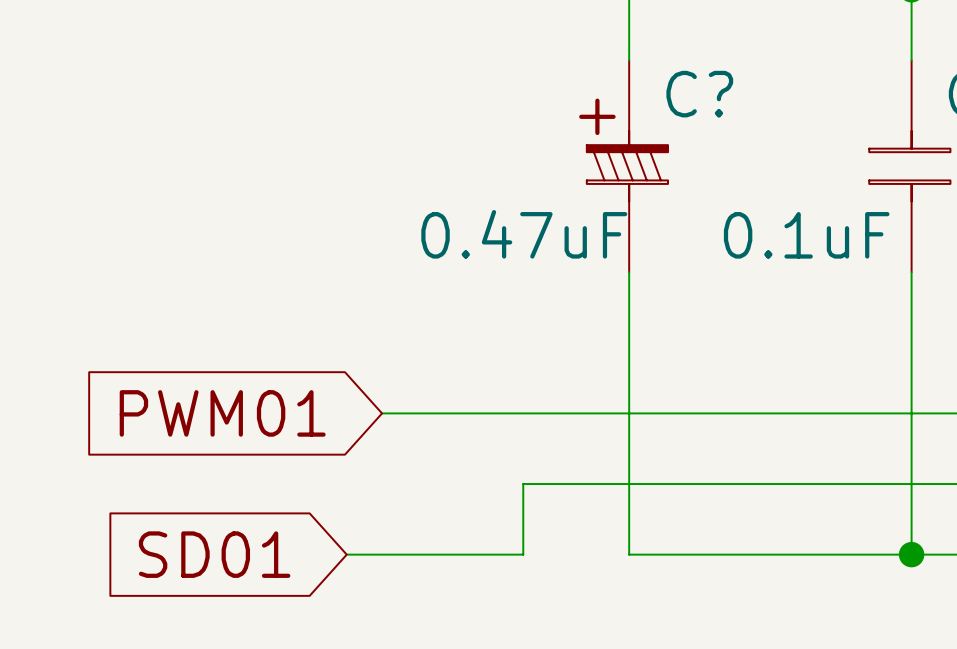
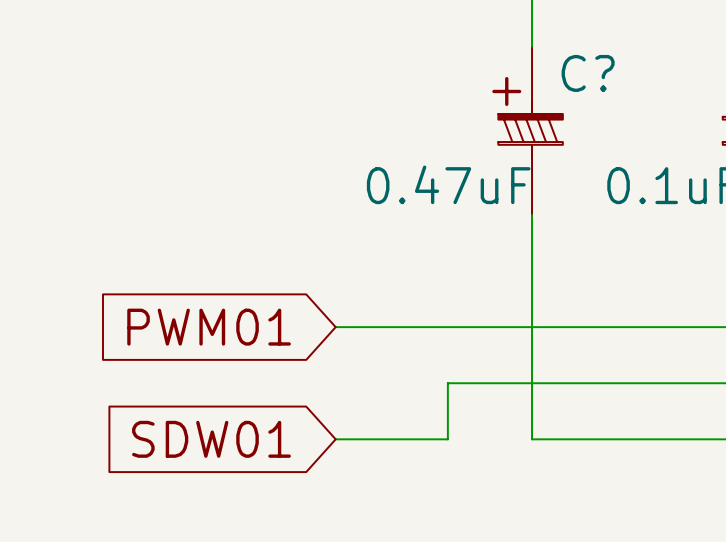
global label: SD01 (214, 554) -> SDW01 (211, 439)
wire: (346, 554) (382, 554) -> none

